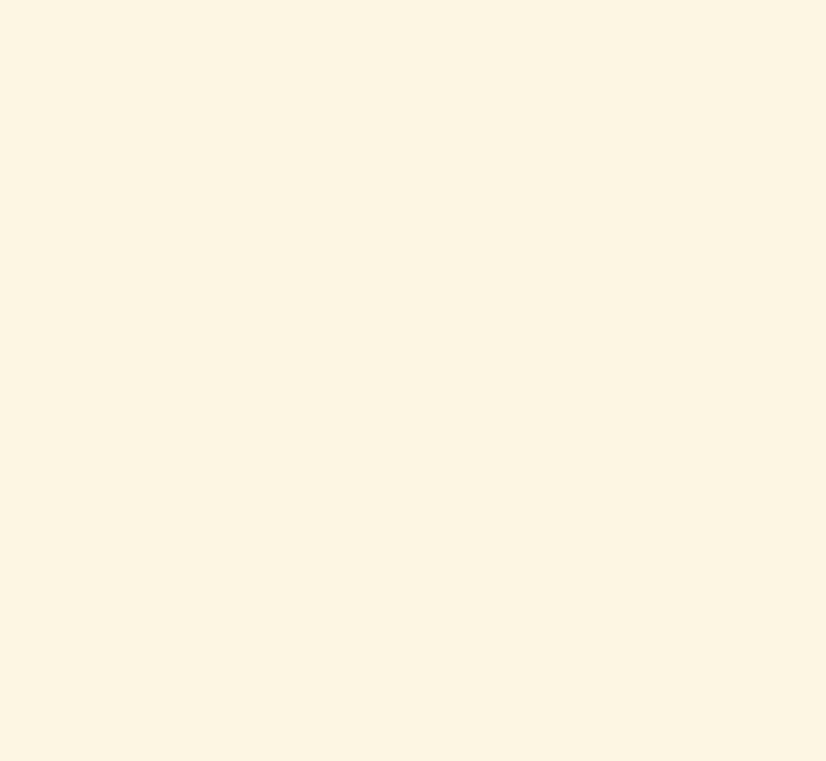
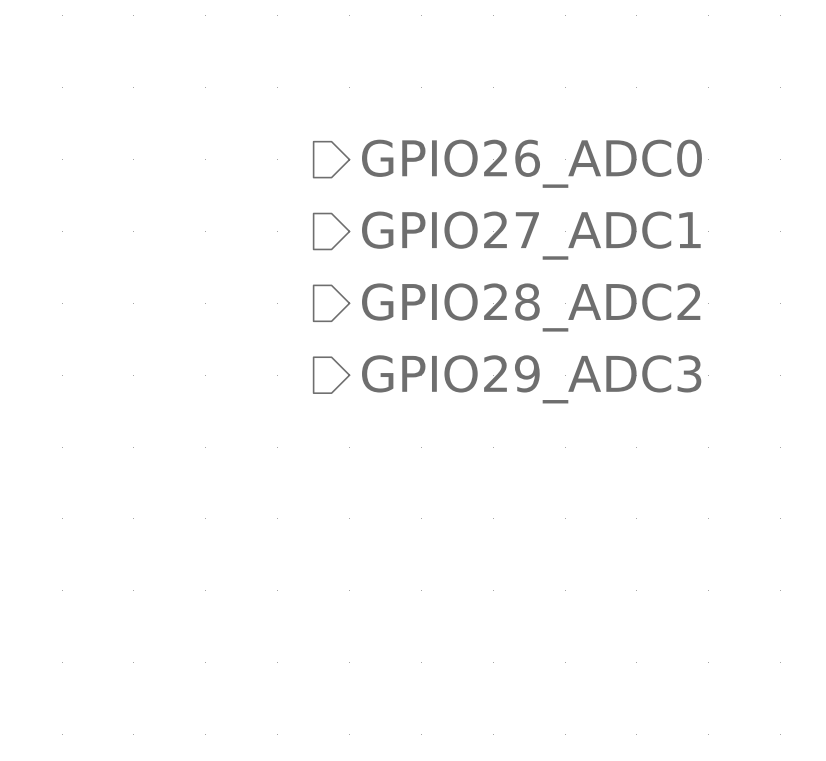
hierarchical label: none -> GPIO26_ADC0 (531, 163)
hierarchical label: none -> GPIO27_ADC1 (531, 235)
hierarchical label: none -> GPIO28_ADC2 (531, 307)
hierarchical label: none -> GPIO29_ADC3 (531, 379)

